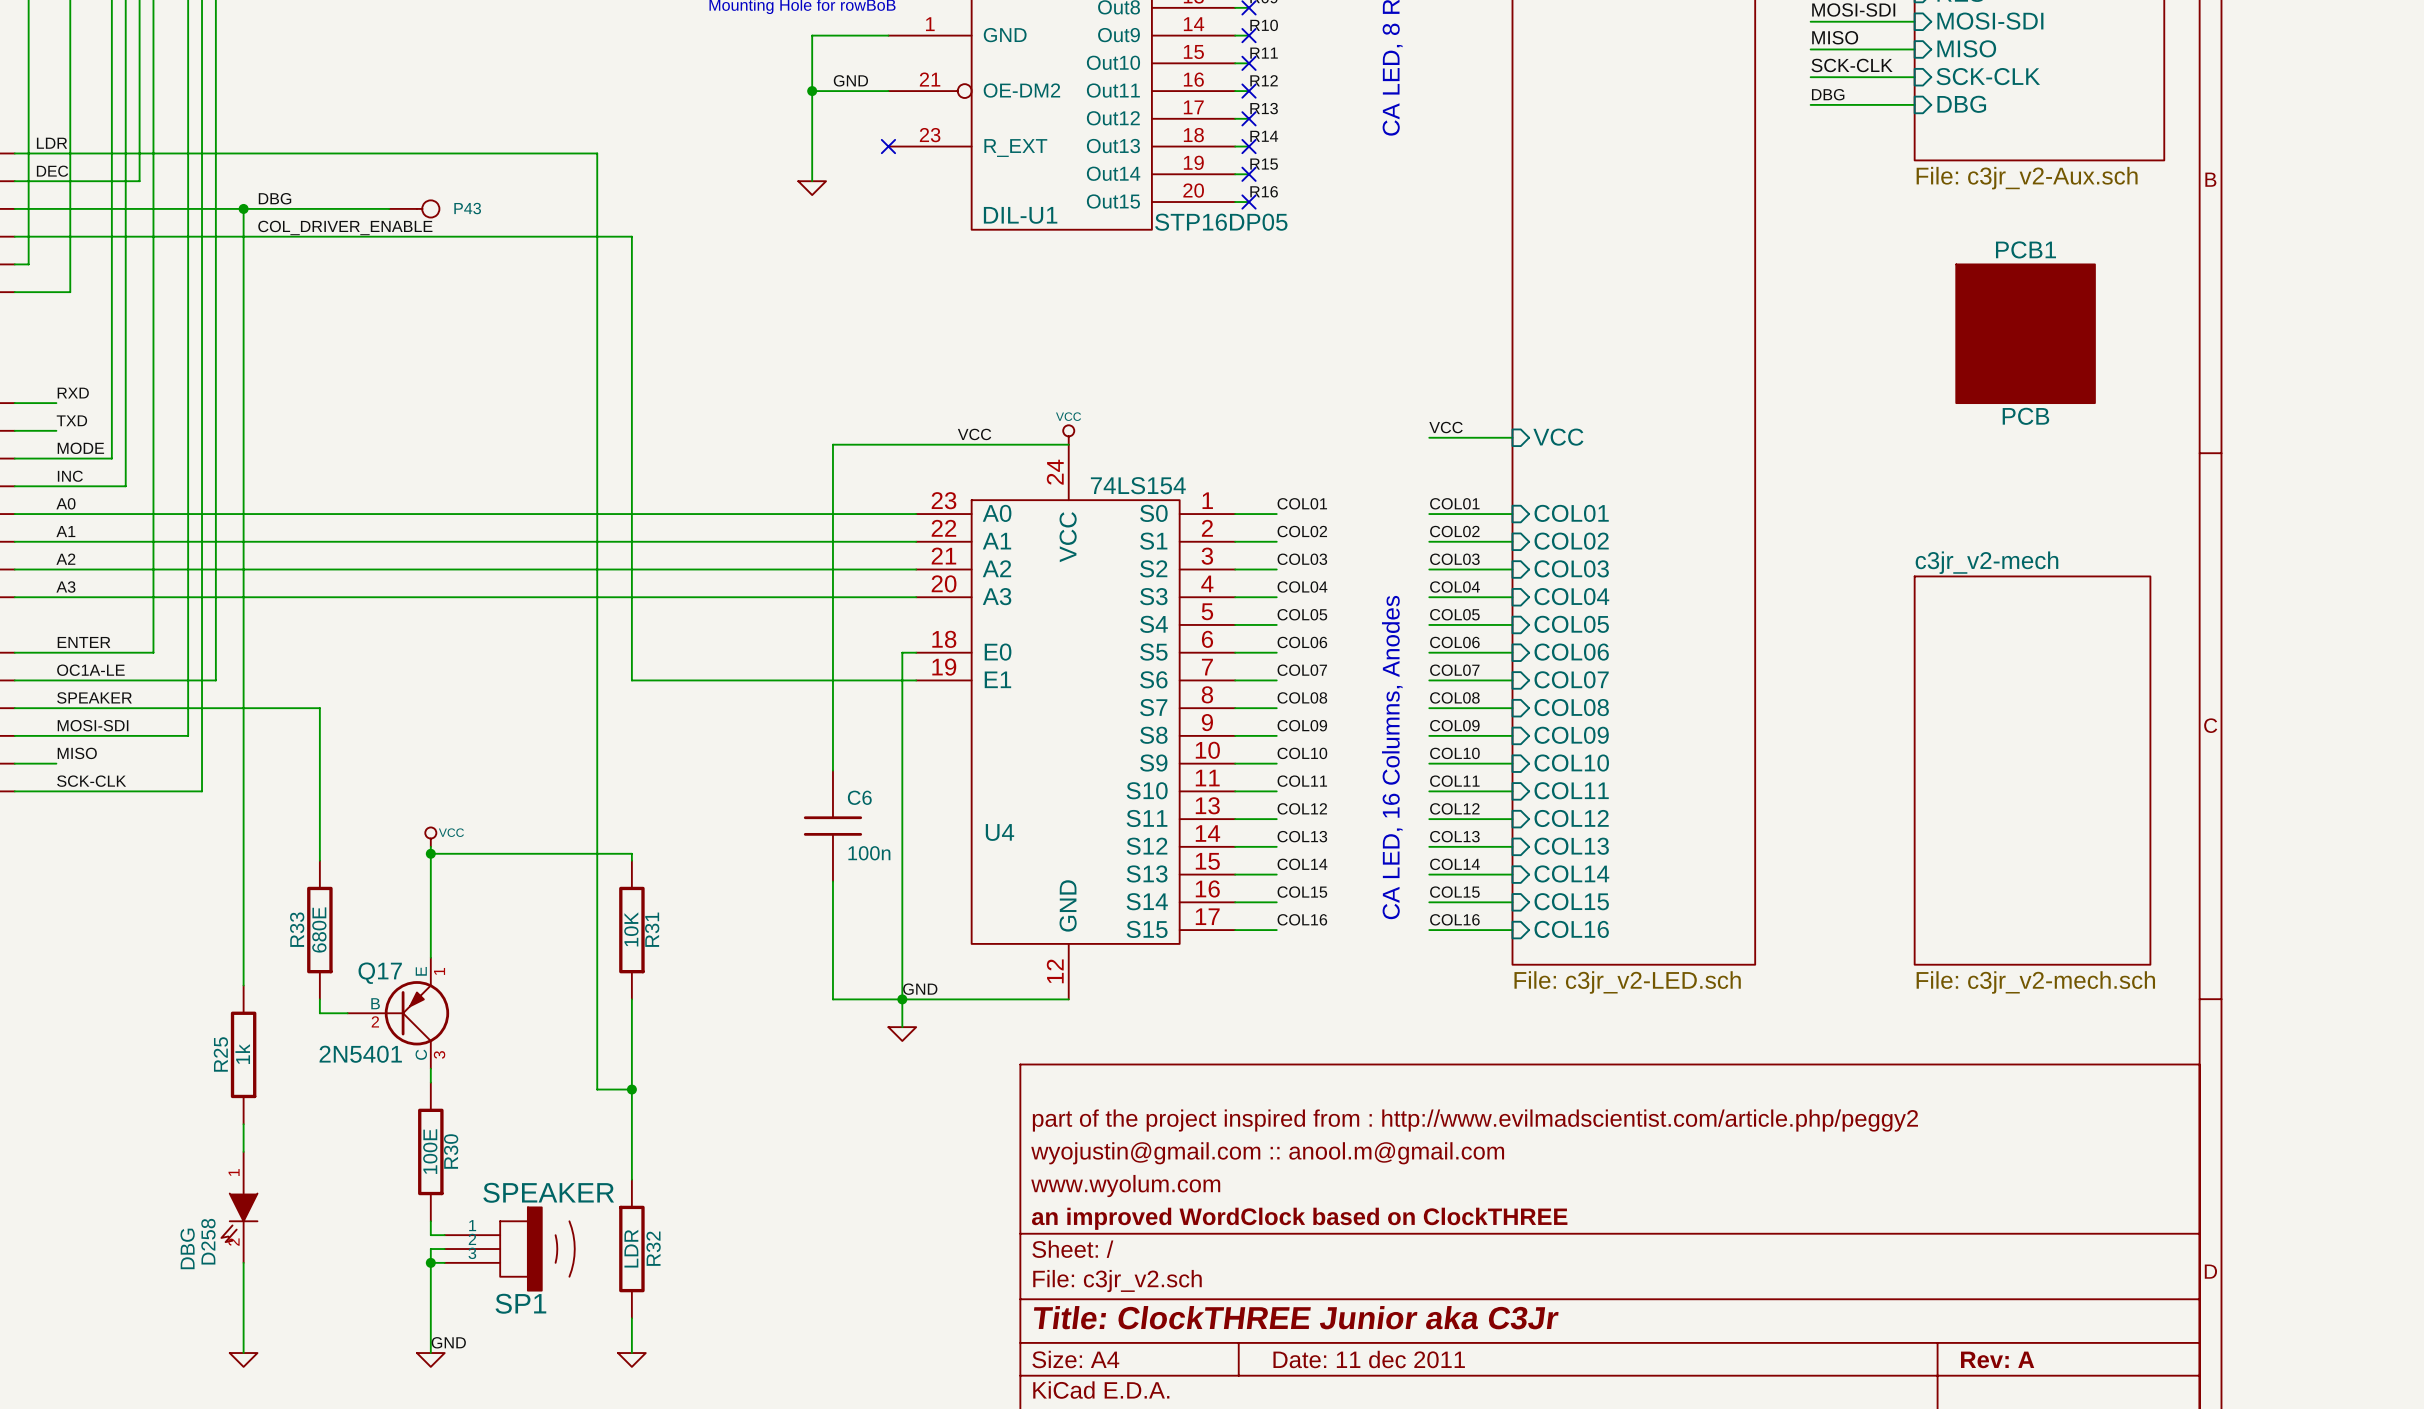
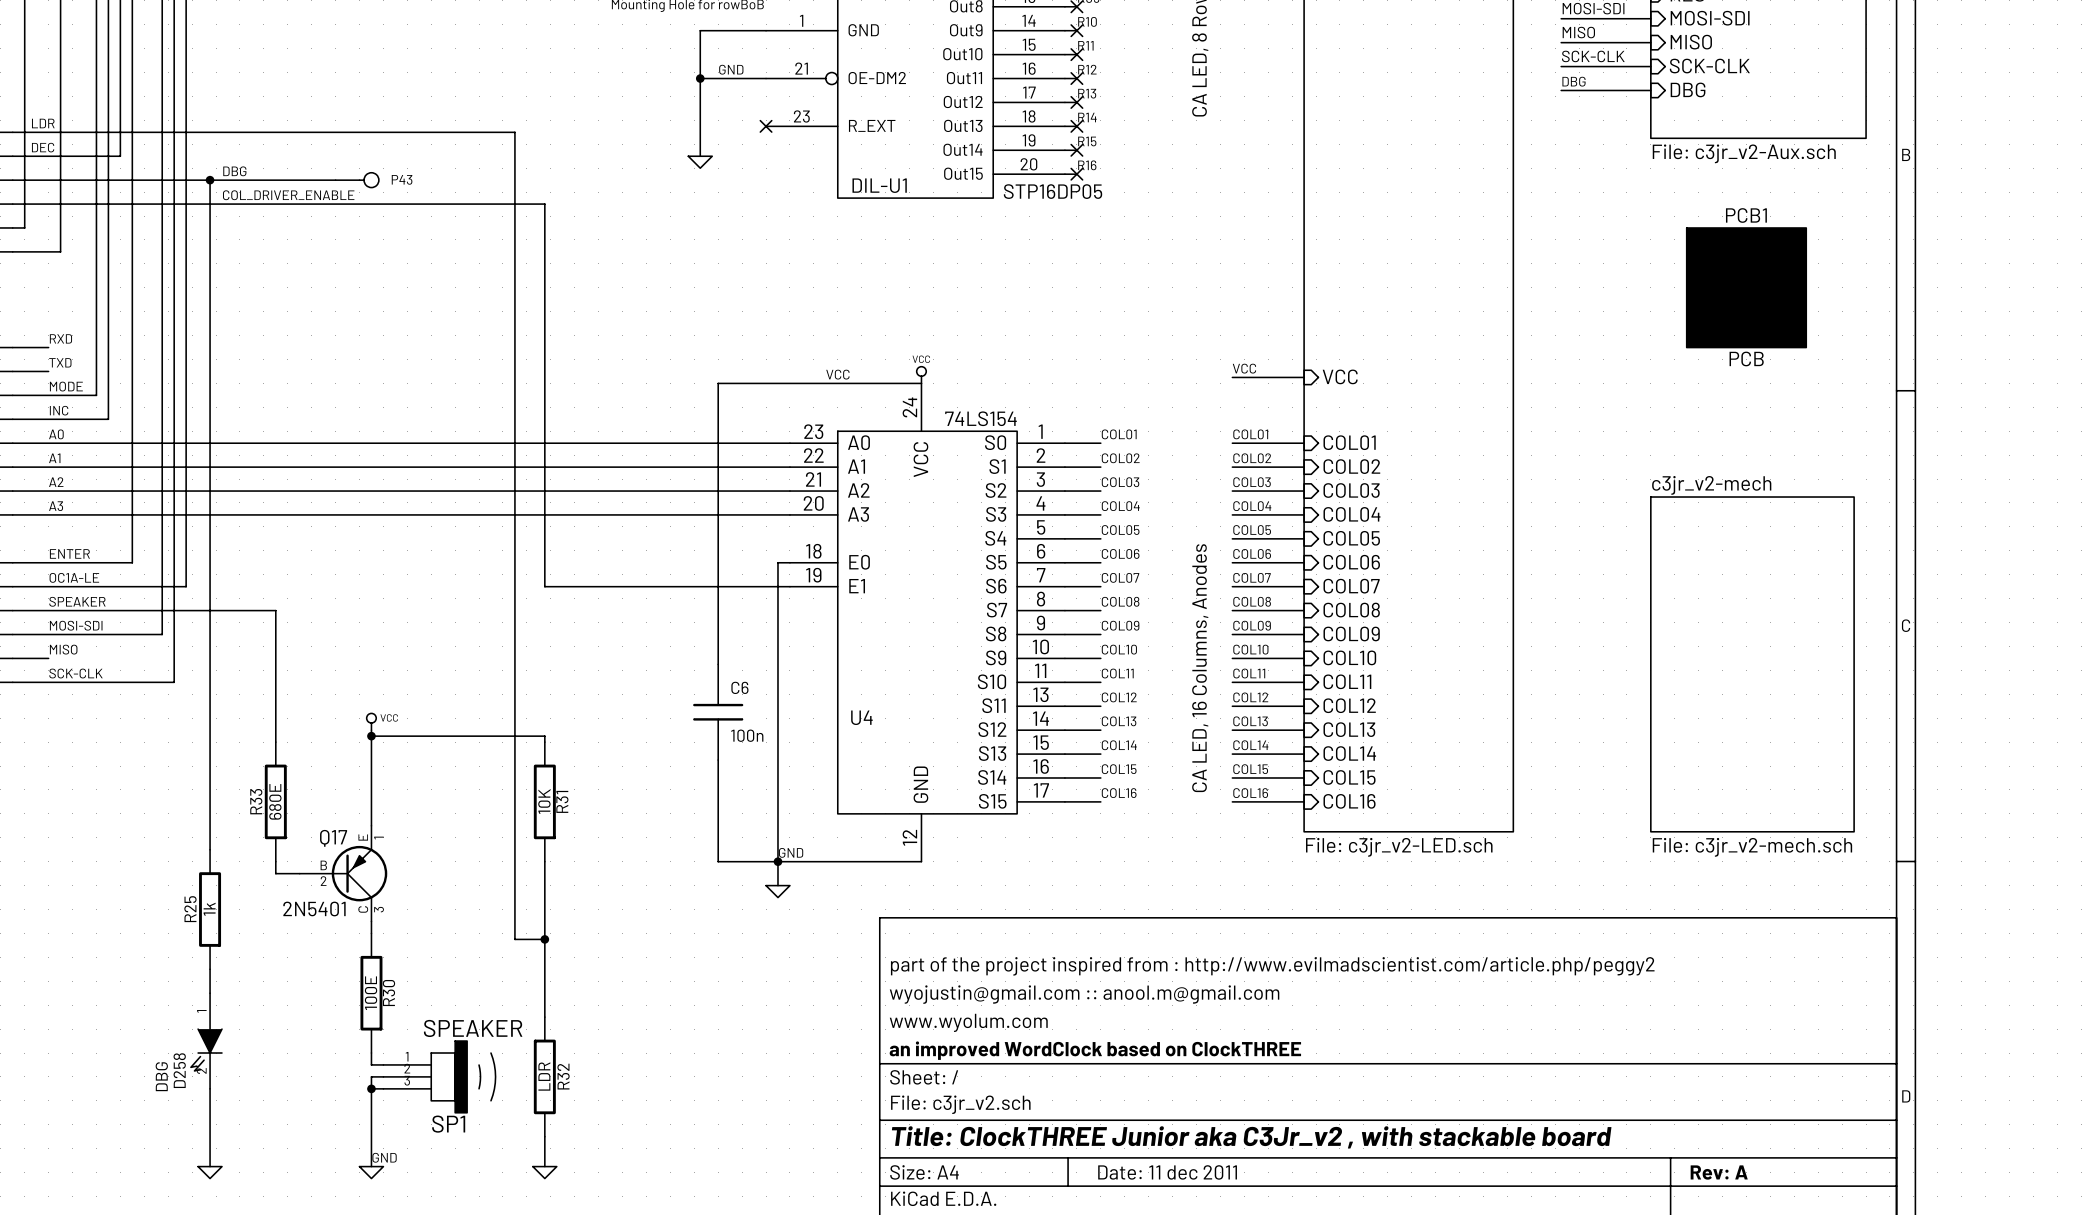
title block: Title: ClockTHREE Junior aka C3Jr (1296, 1317) -> Title: ClockTHREE Junior aka C3Jr_v2 , with stackable board (1251, 1137)

